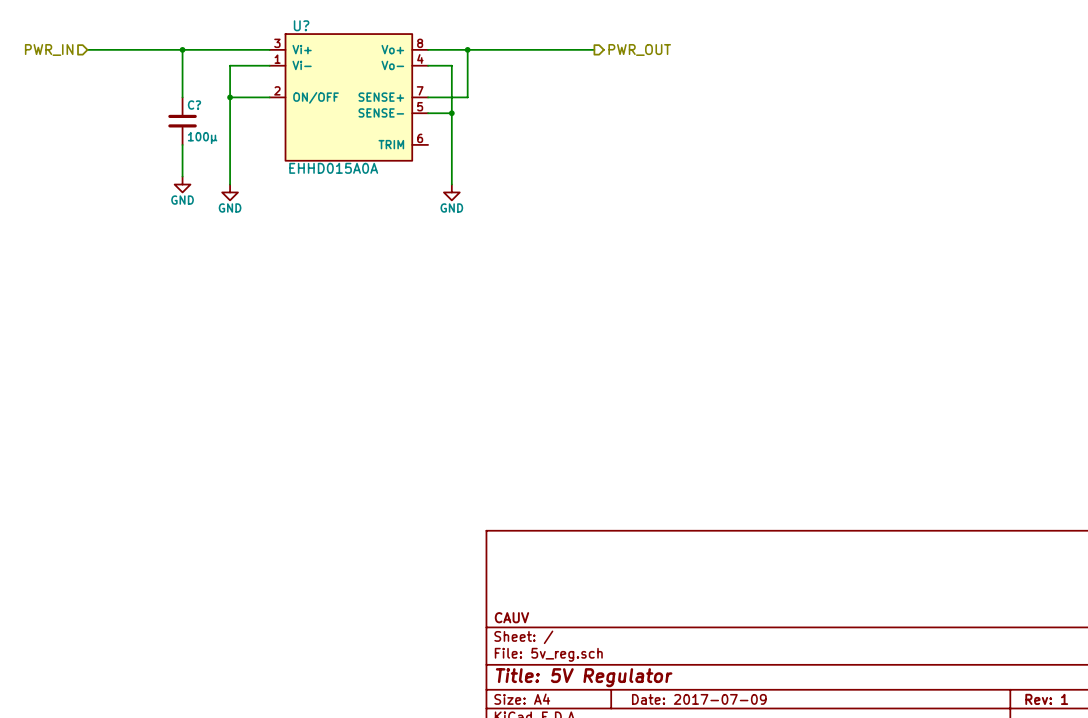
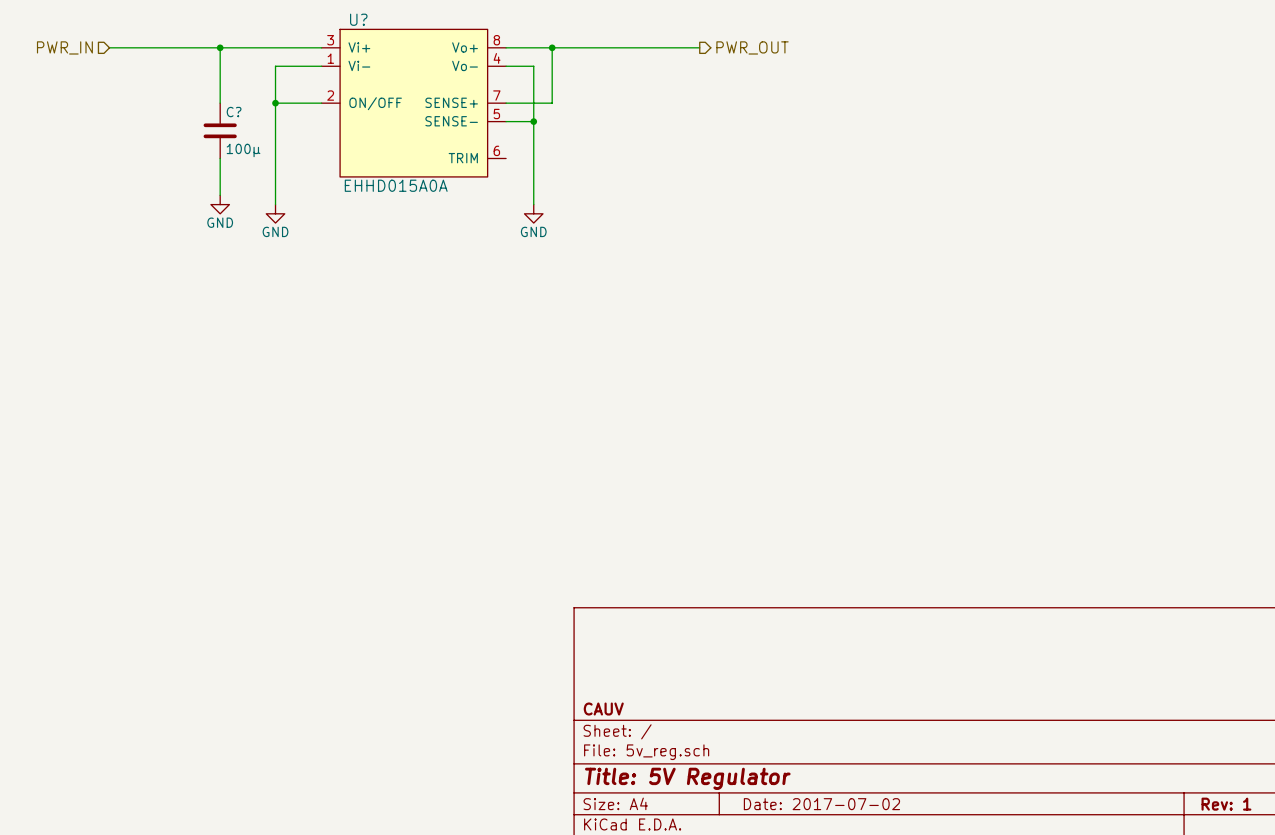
title block: Date: 2017-07-09 (699, 699) -> Date: 2017-07-02 (821, 804)

